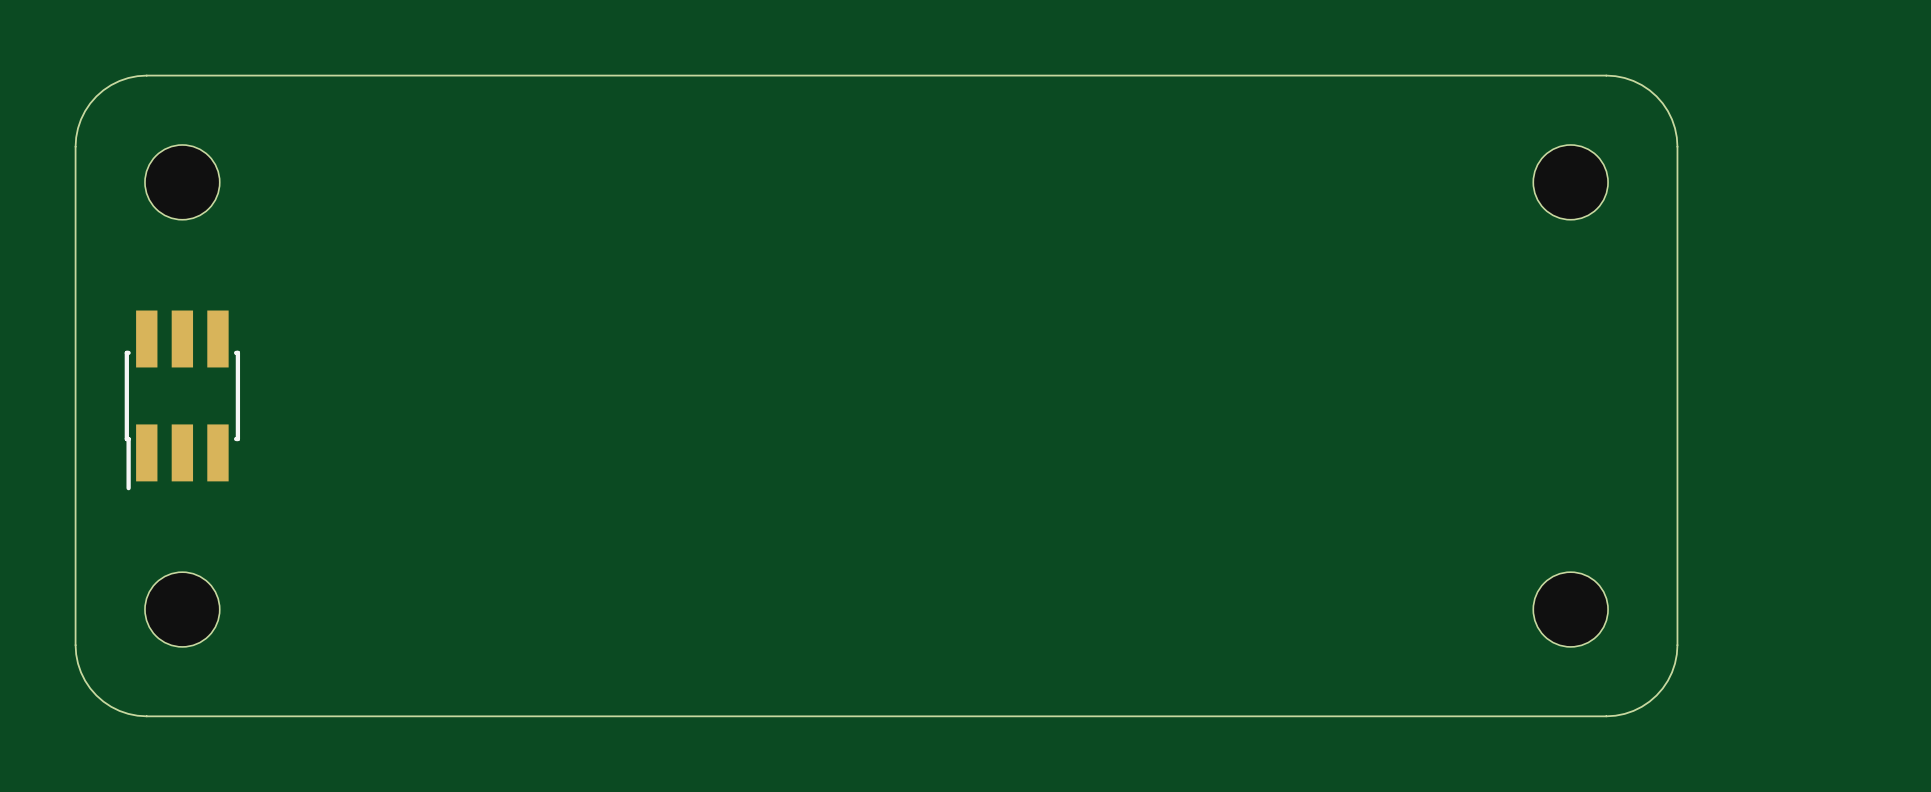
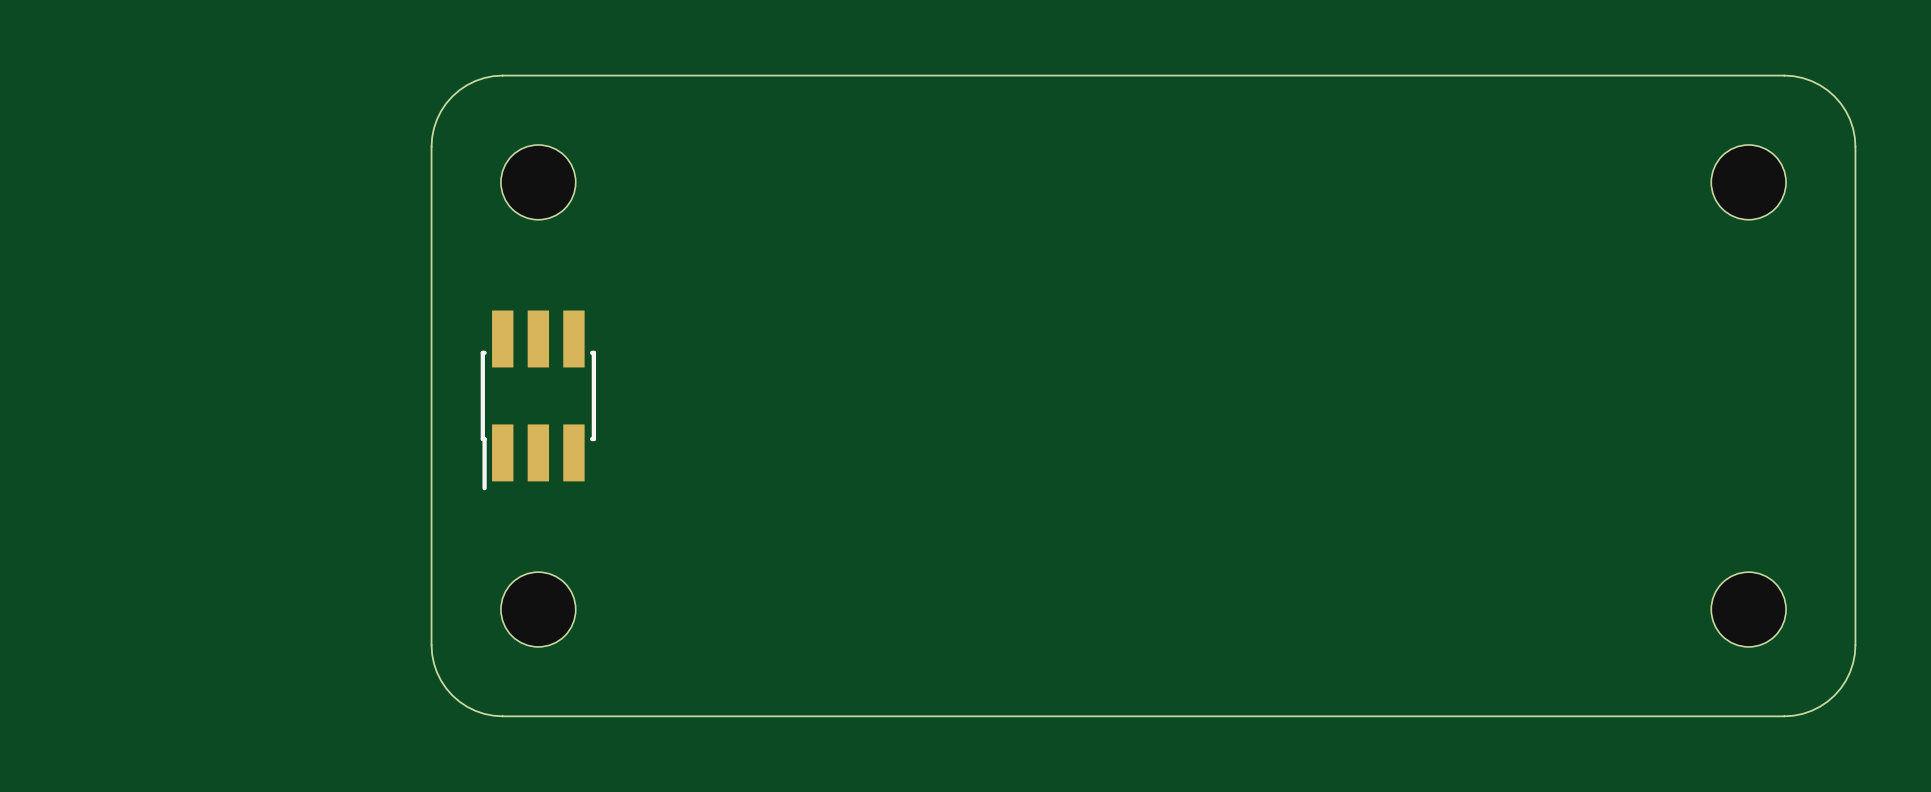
board edge: (502, 75) (137, 76) (111, 85) (96, 96) (80, 119) (75, 146) (75, 645) (80, 672) (90, 688) (111, 706) (137, 715) (502, 716) -> (502, 75) (475, 80) (452, 96) (436, 119) (431, 146) (432, 654) (436, 672) (452, 695) (475, 710) (502, 716)
board edge: (1606, 75) (1633, 80) (1656, 96) (1672, 119) (1677, 146) (1676, 654) (1667, 680) (1649, 701) (1633, 710) (1606, 716) -> (1606, 75) (1784, 75) (1802, 78) (1819, 85) (1840, 103) (1850, 119) (1855, 146) (1855, 645) (1850, 672) (1840, 688) (1827, 701) (1811, 710) (1793, 715) (1606, 716)
part: (182, 182) -> none
part: none -> (538, 182)
part position: (1570, 182) -> (1748, 182)
part position: (182, 400) -> (538, 400)
part: (182, 609) -> none
part: none -> (538, 609)
part position: (1570, 609) -> (1748, 609)

